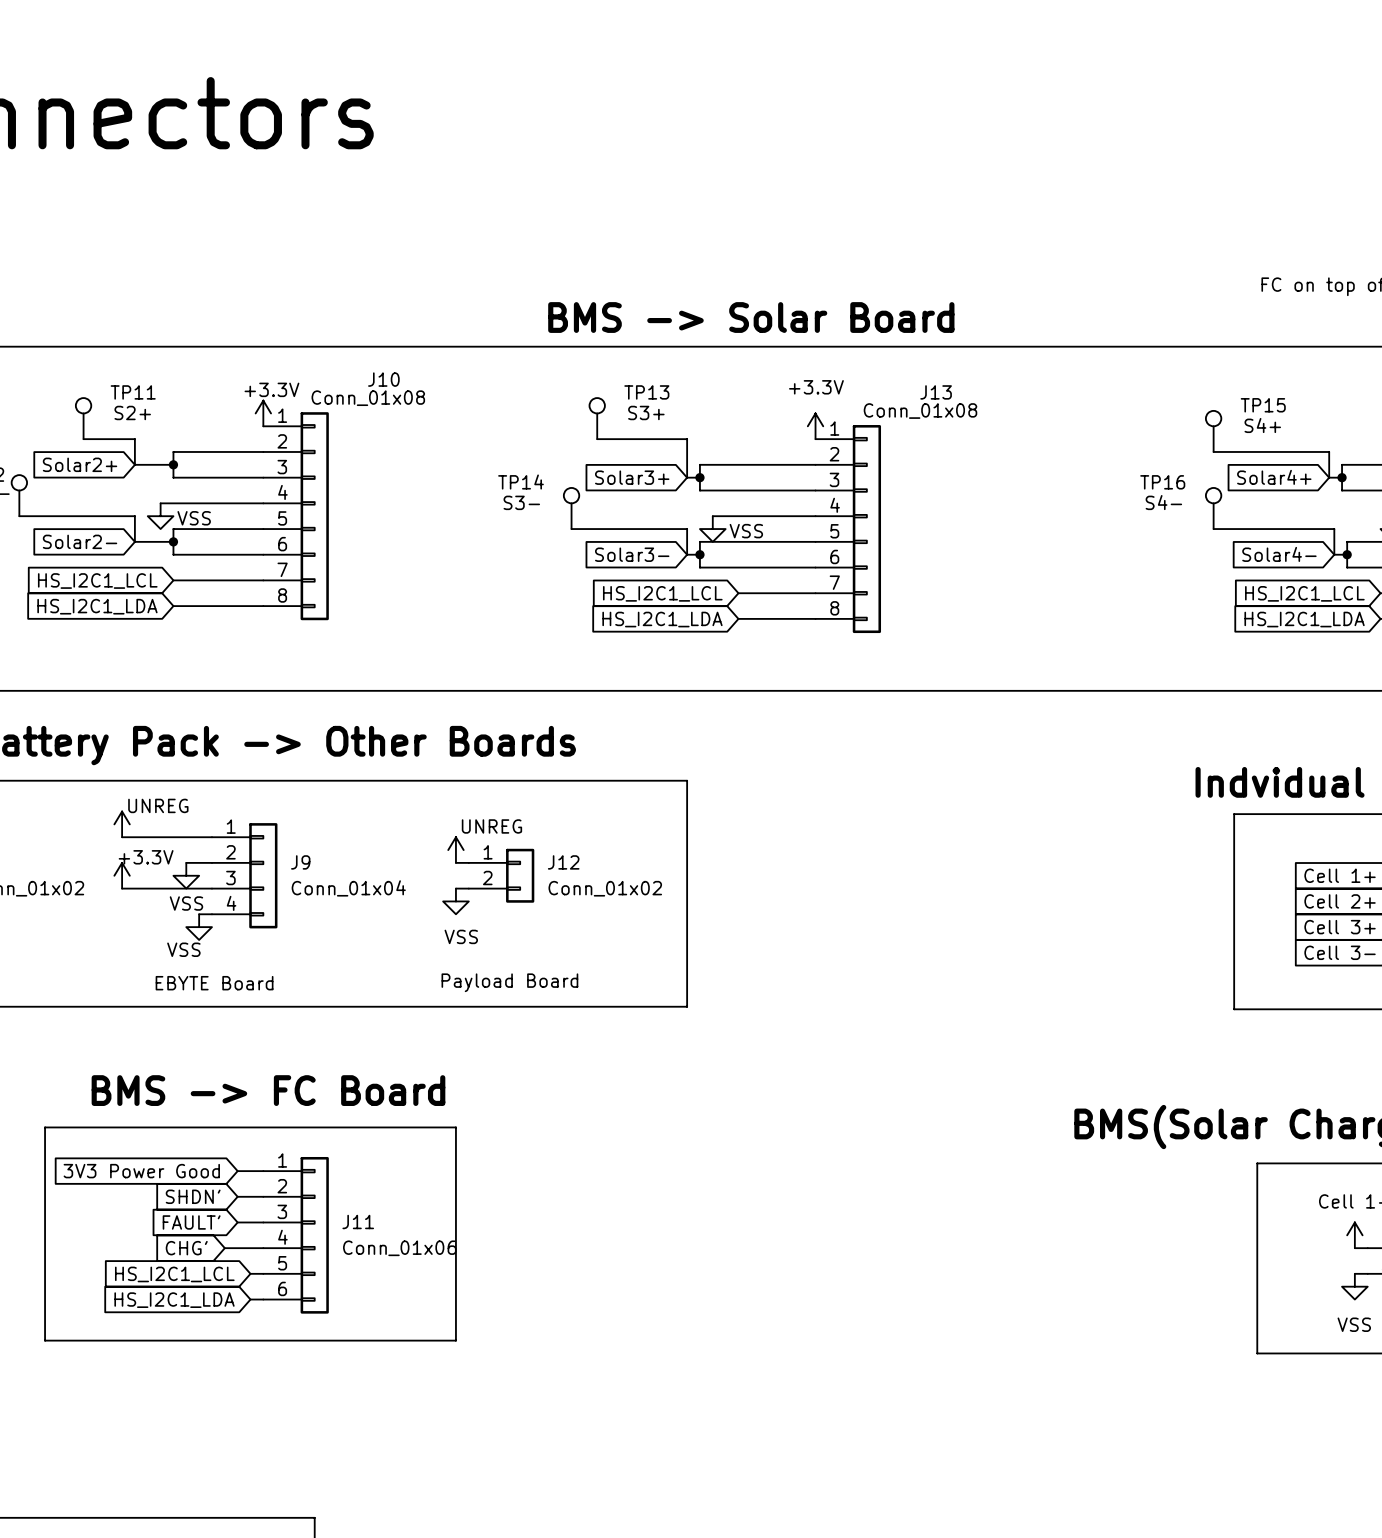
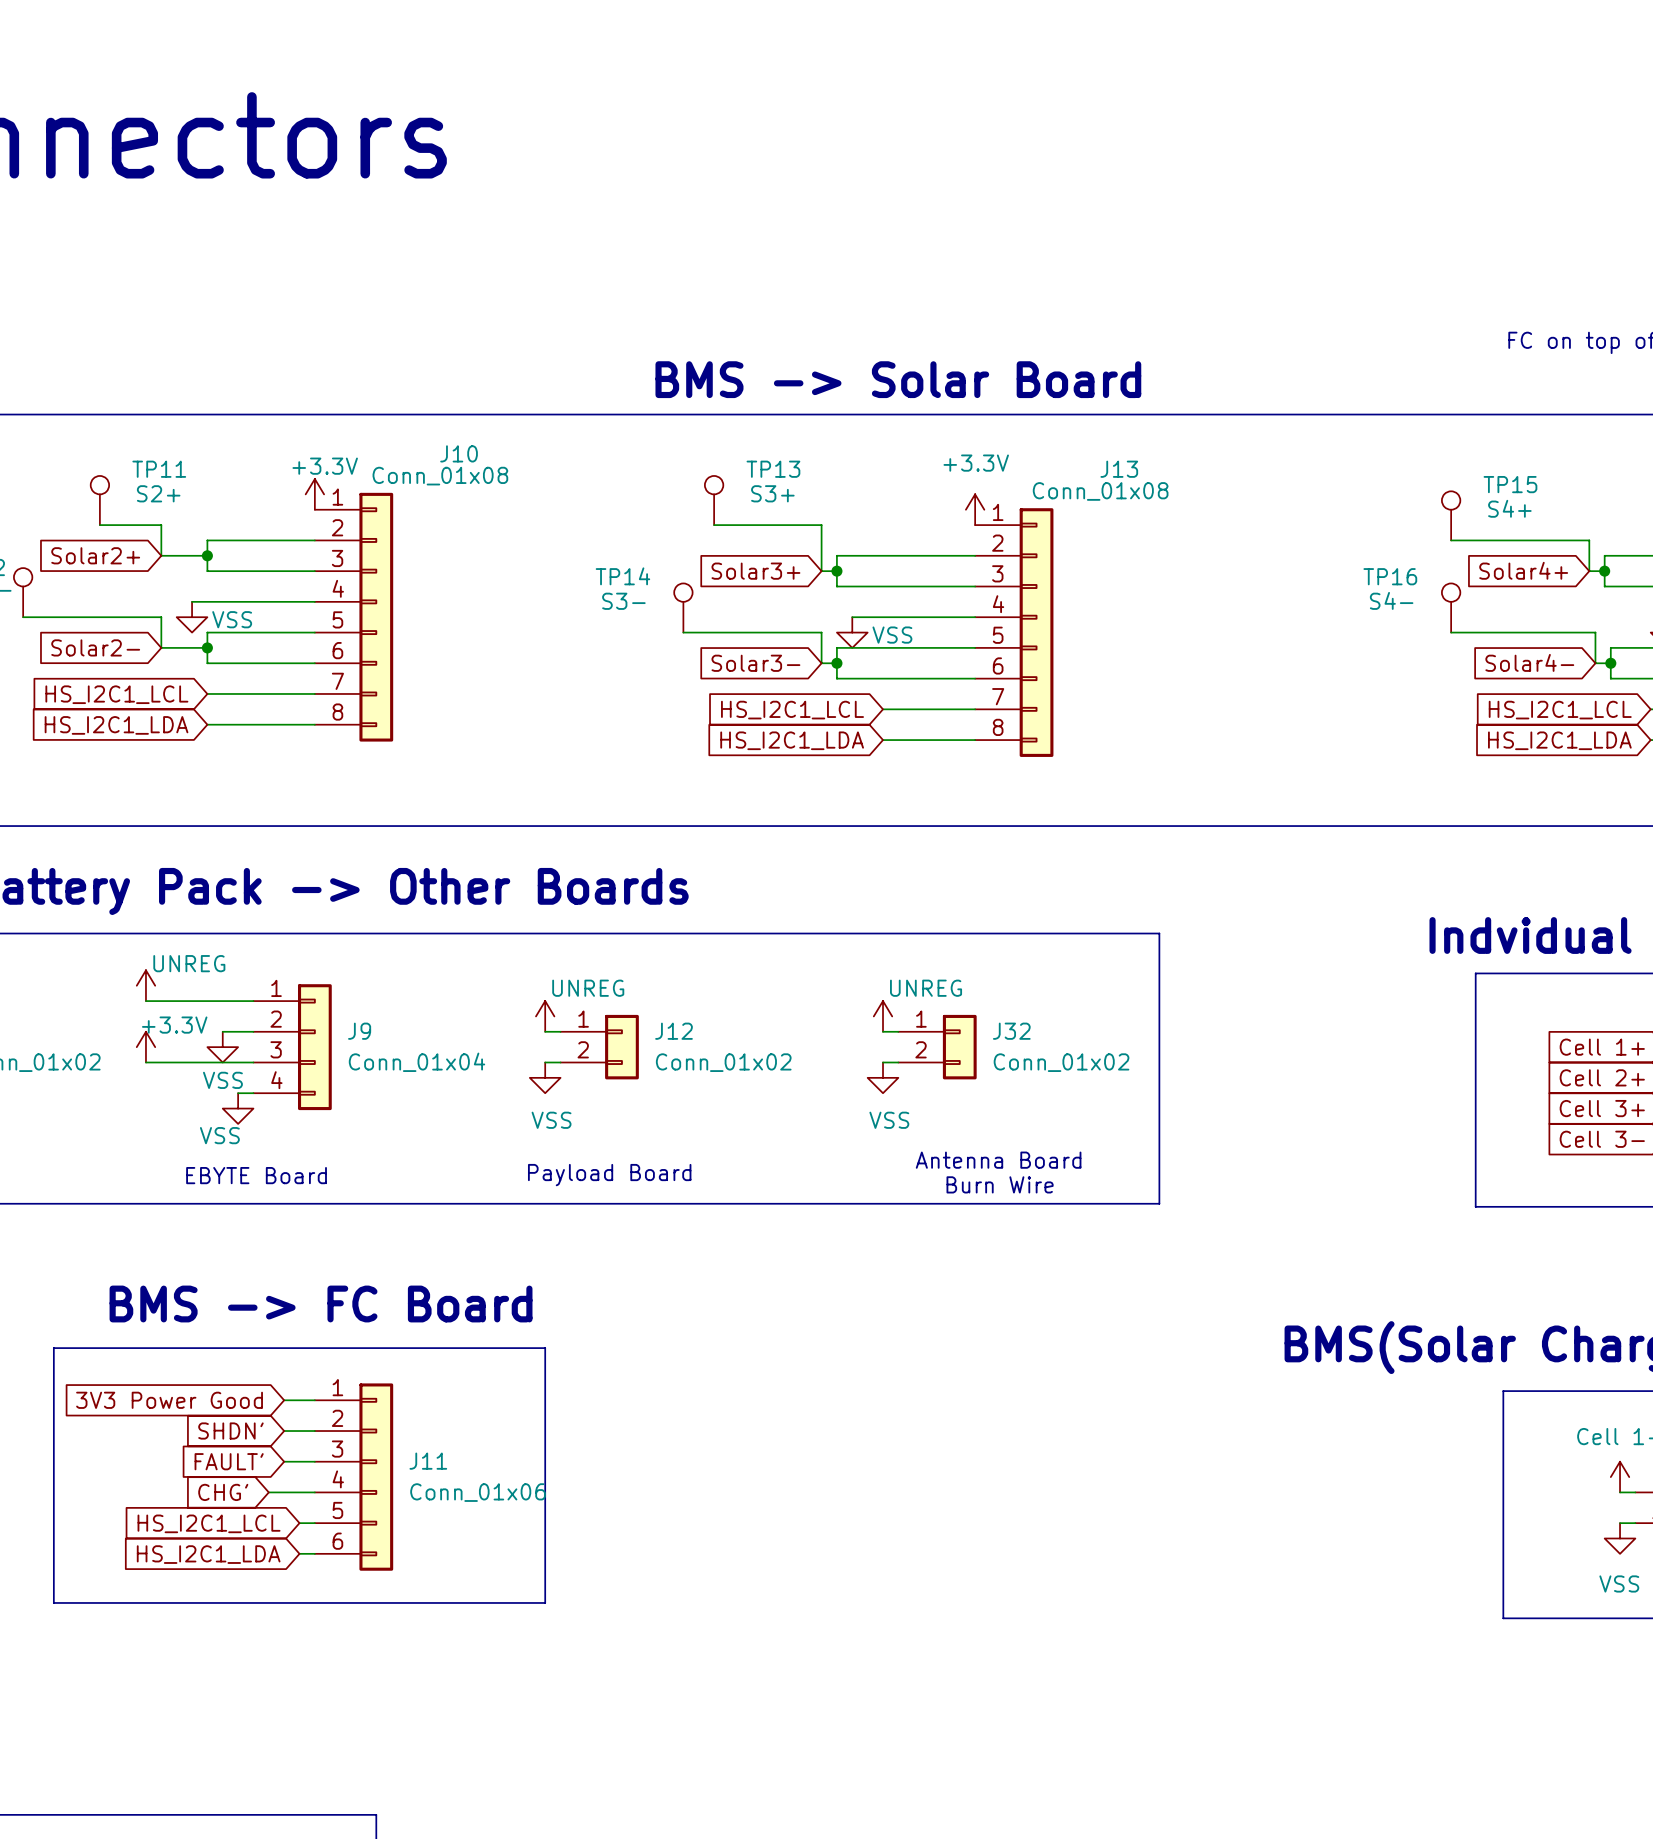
line: (687, 780) (687, 1006) -> (821, 933) (1159, 933) (1159, 1203) (821, 1203)
power symbol: none -> UNREG (883, 1016)
wire: none -> (883, 1031) (898, 1031)
J32: none -> Conn_01x02 (937, 1047)
wire: none -> (883, 1062) (898, 1062)
power symbol: none -> VSS (883, 1077)
text: none -> Antenna Board (998, 1160)
text: none -> Burn Wire (1000, 1184)

